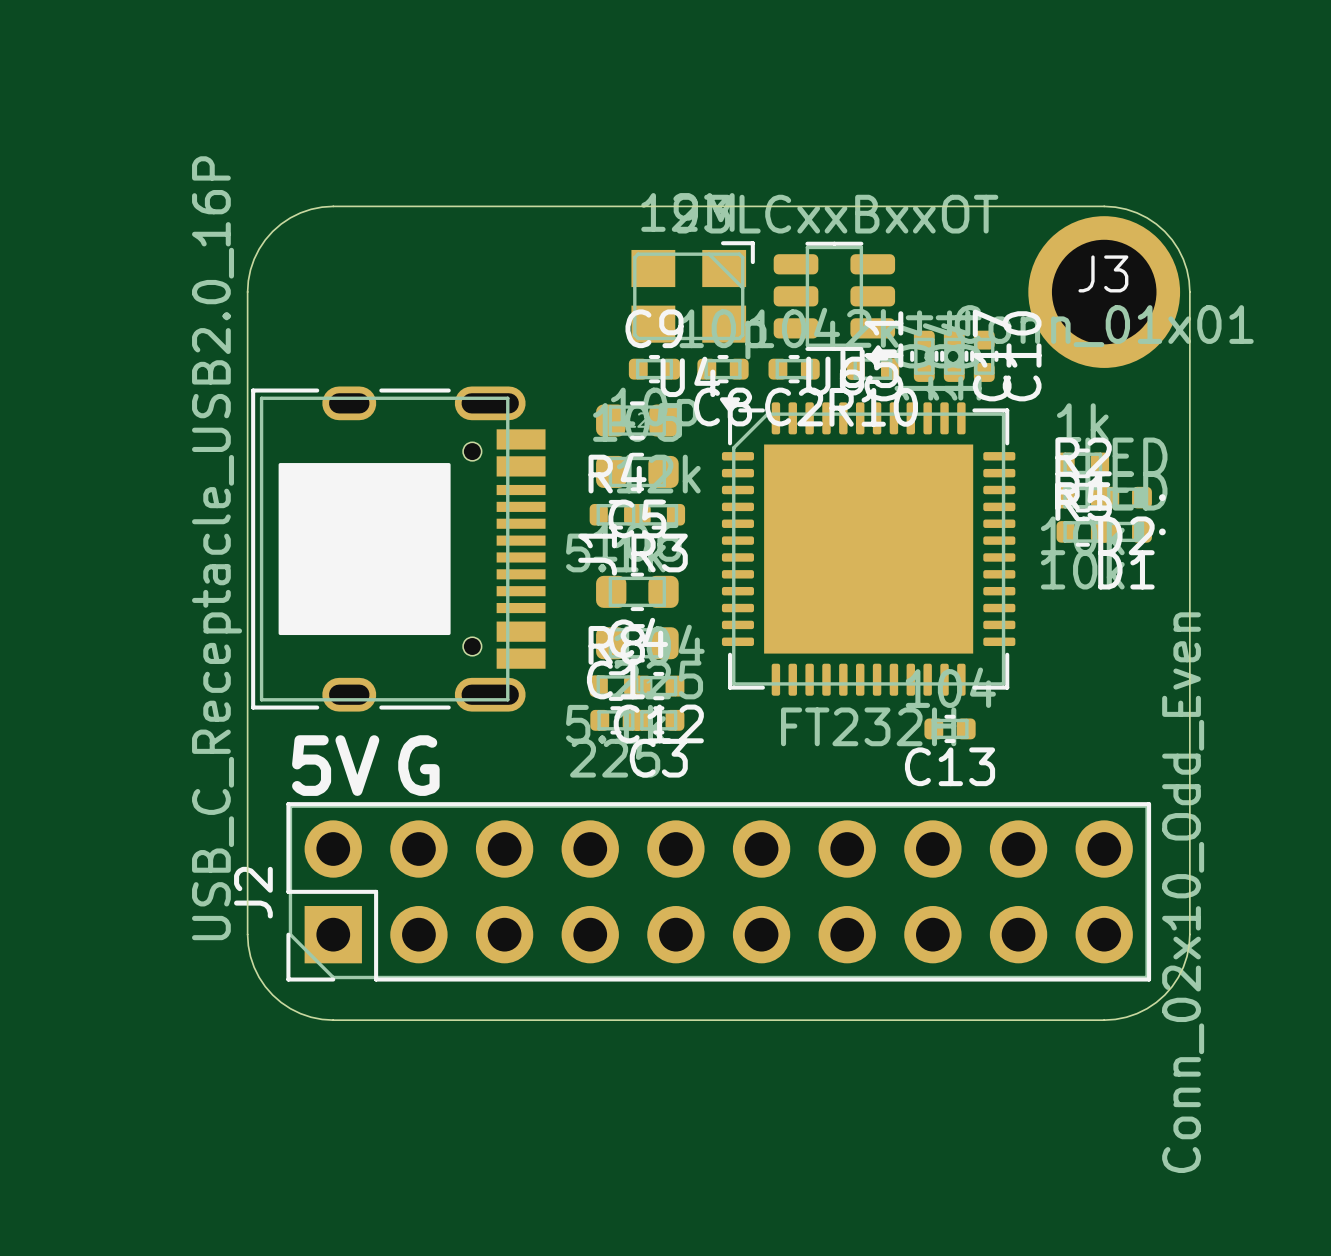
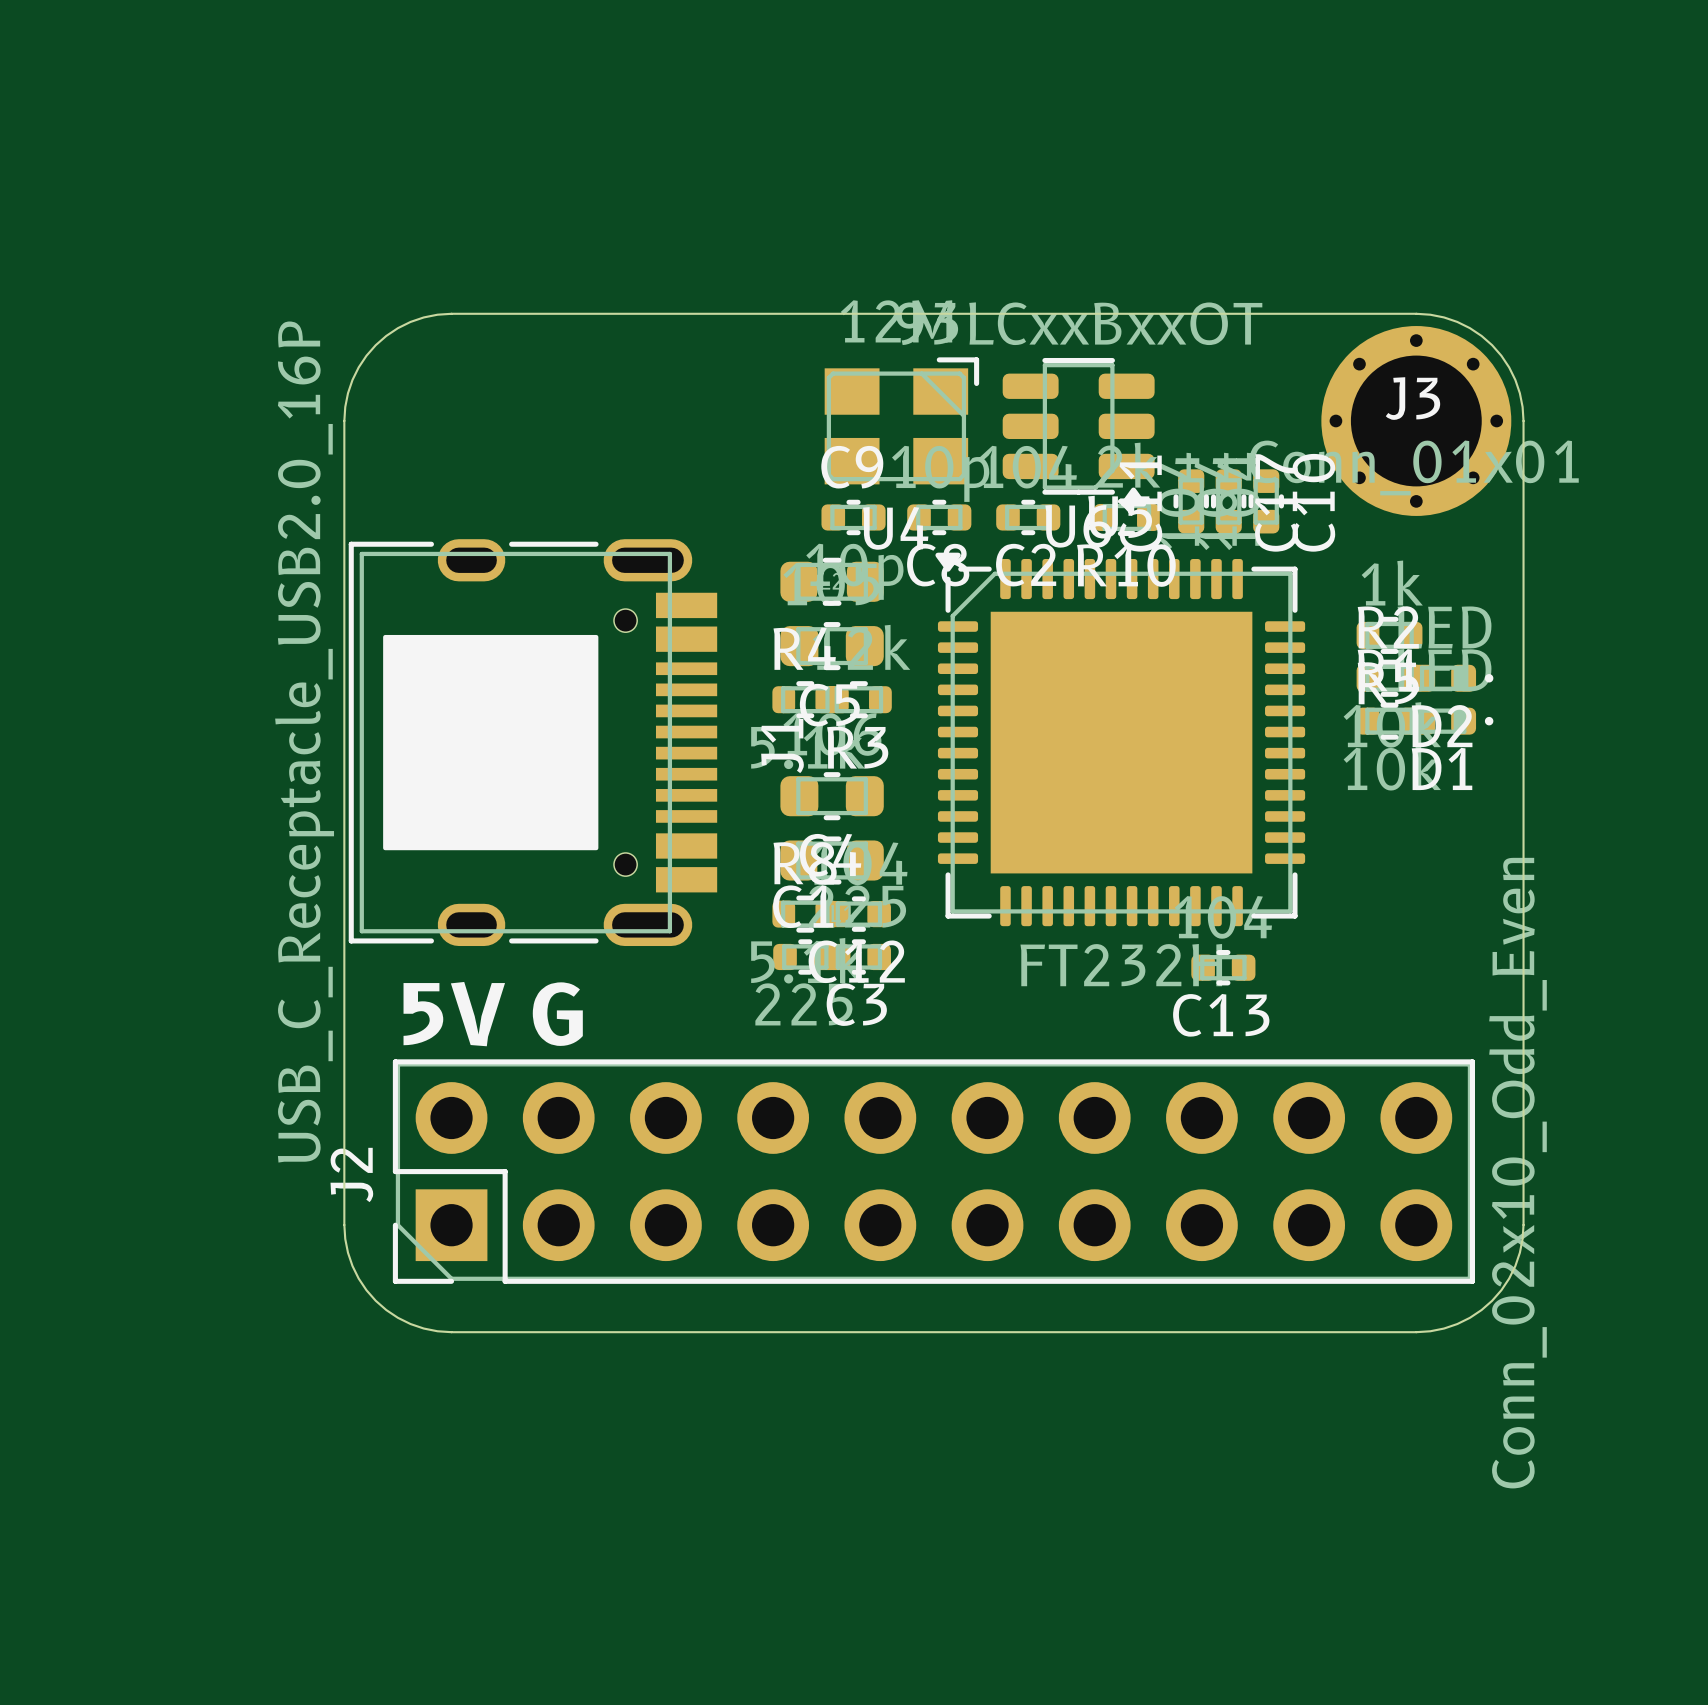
J3 footprint: [1028, 216, 1181, 368] -> [1321, 326, 1512, 516]

